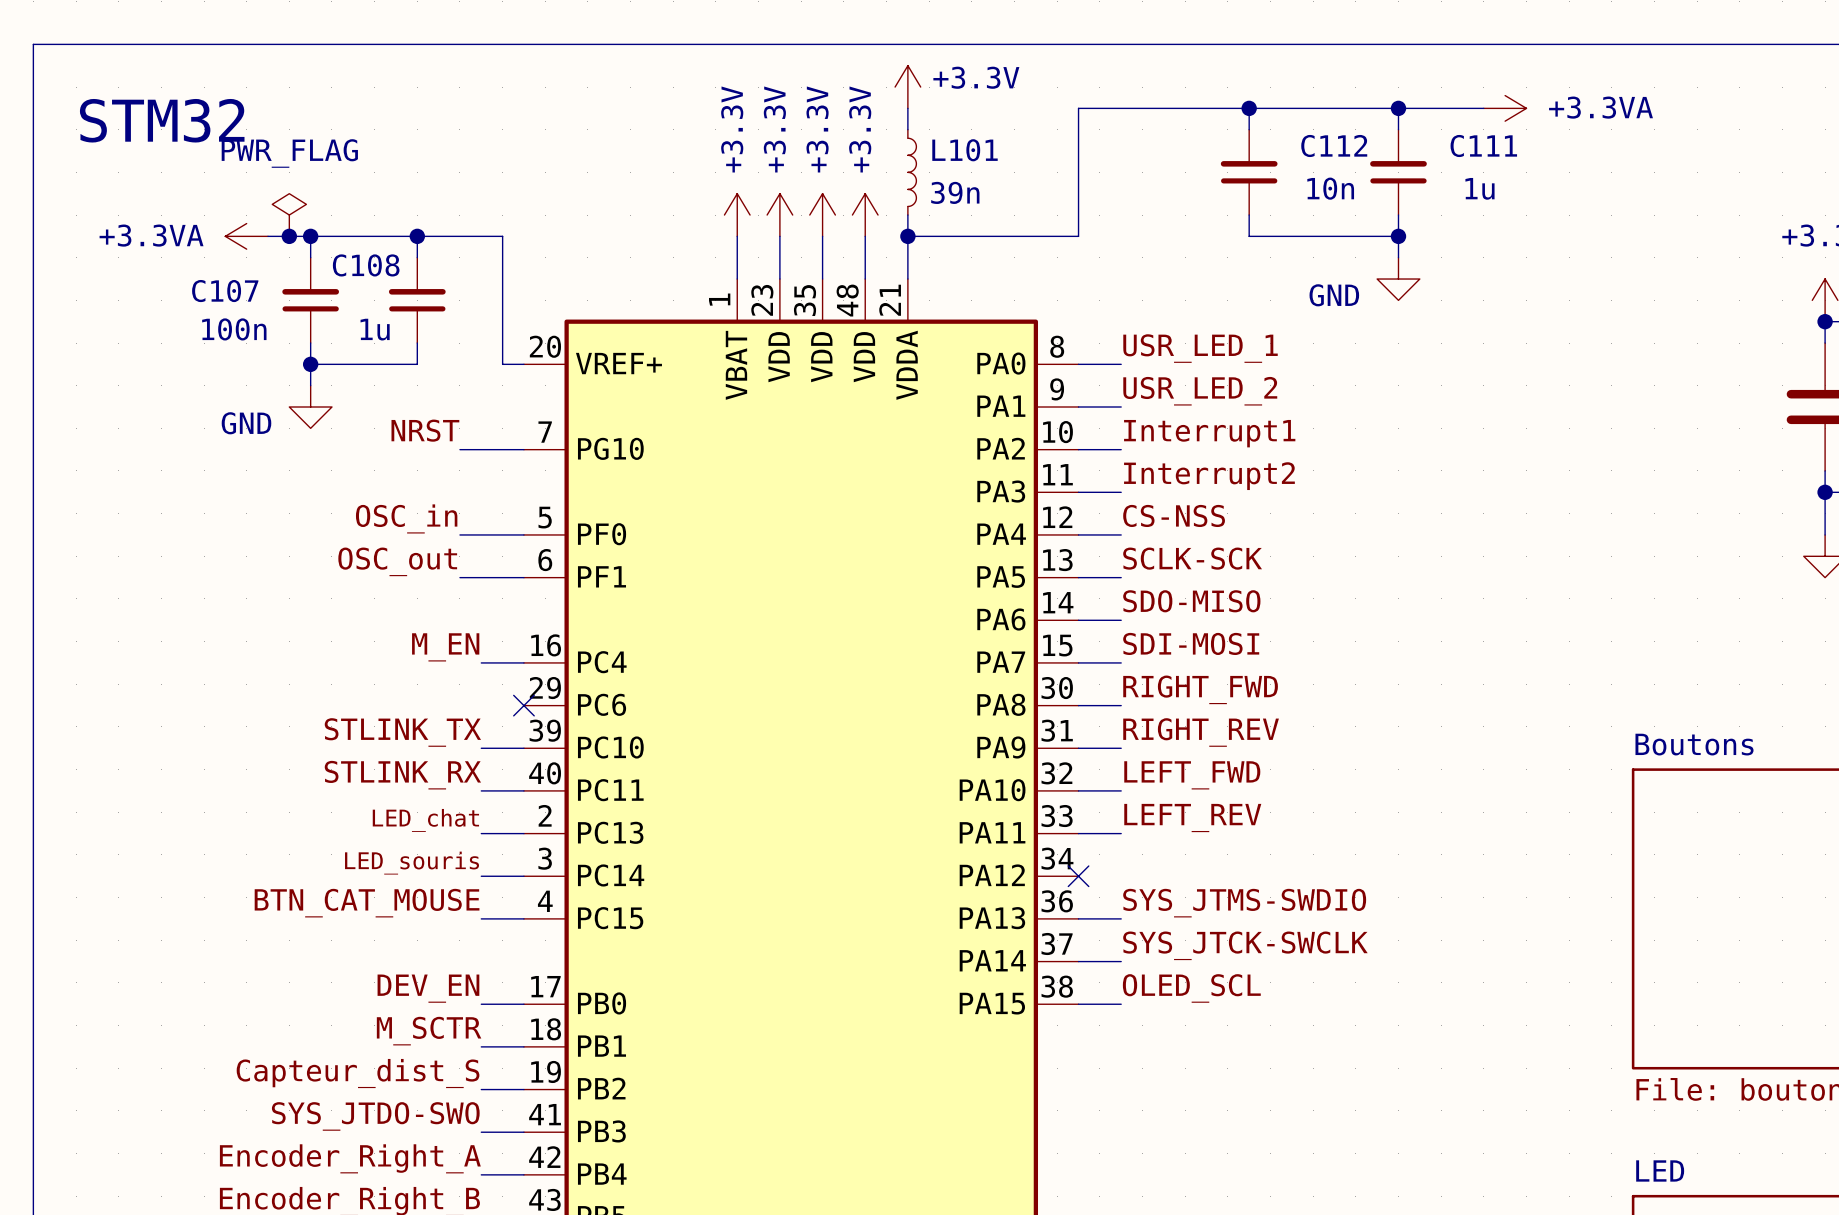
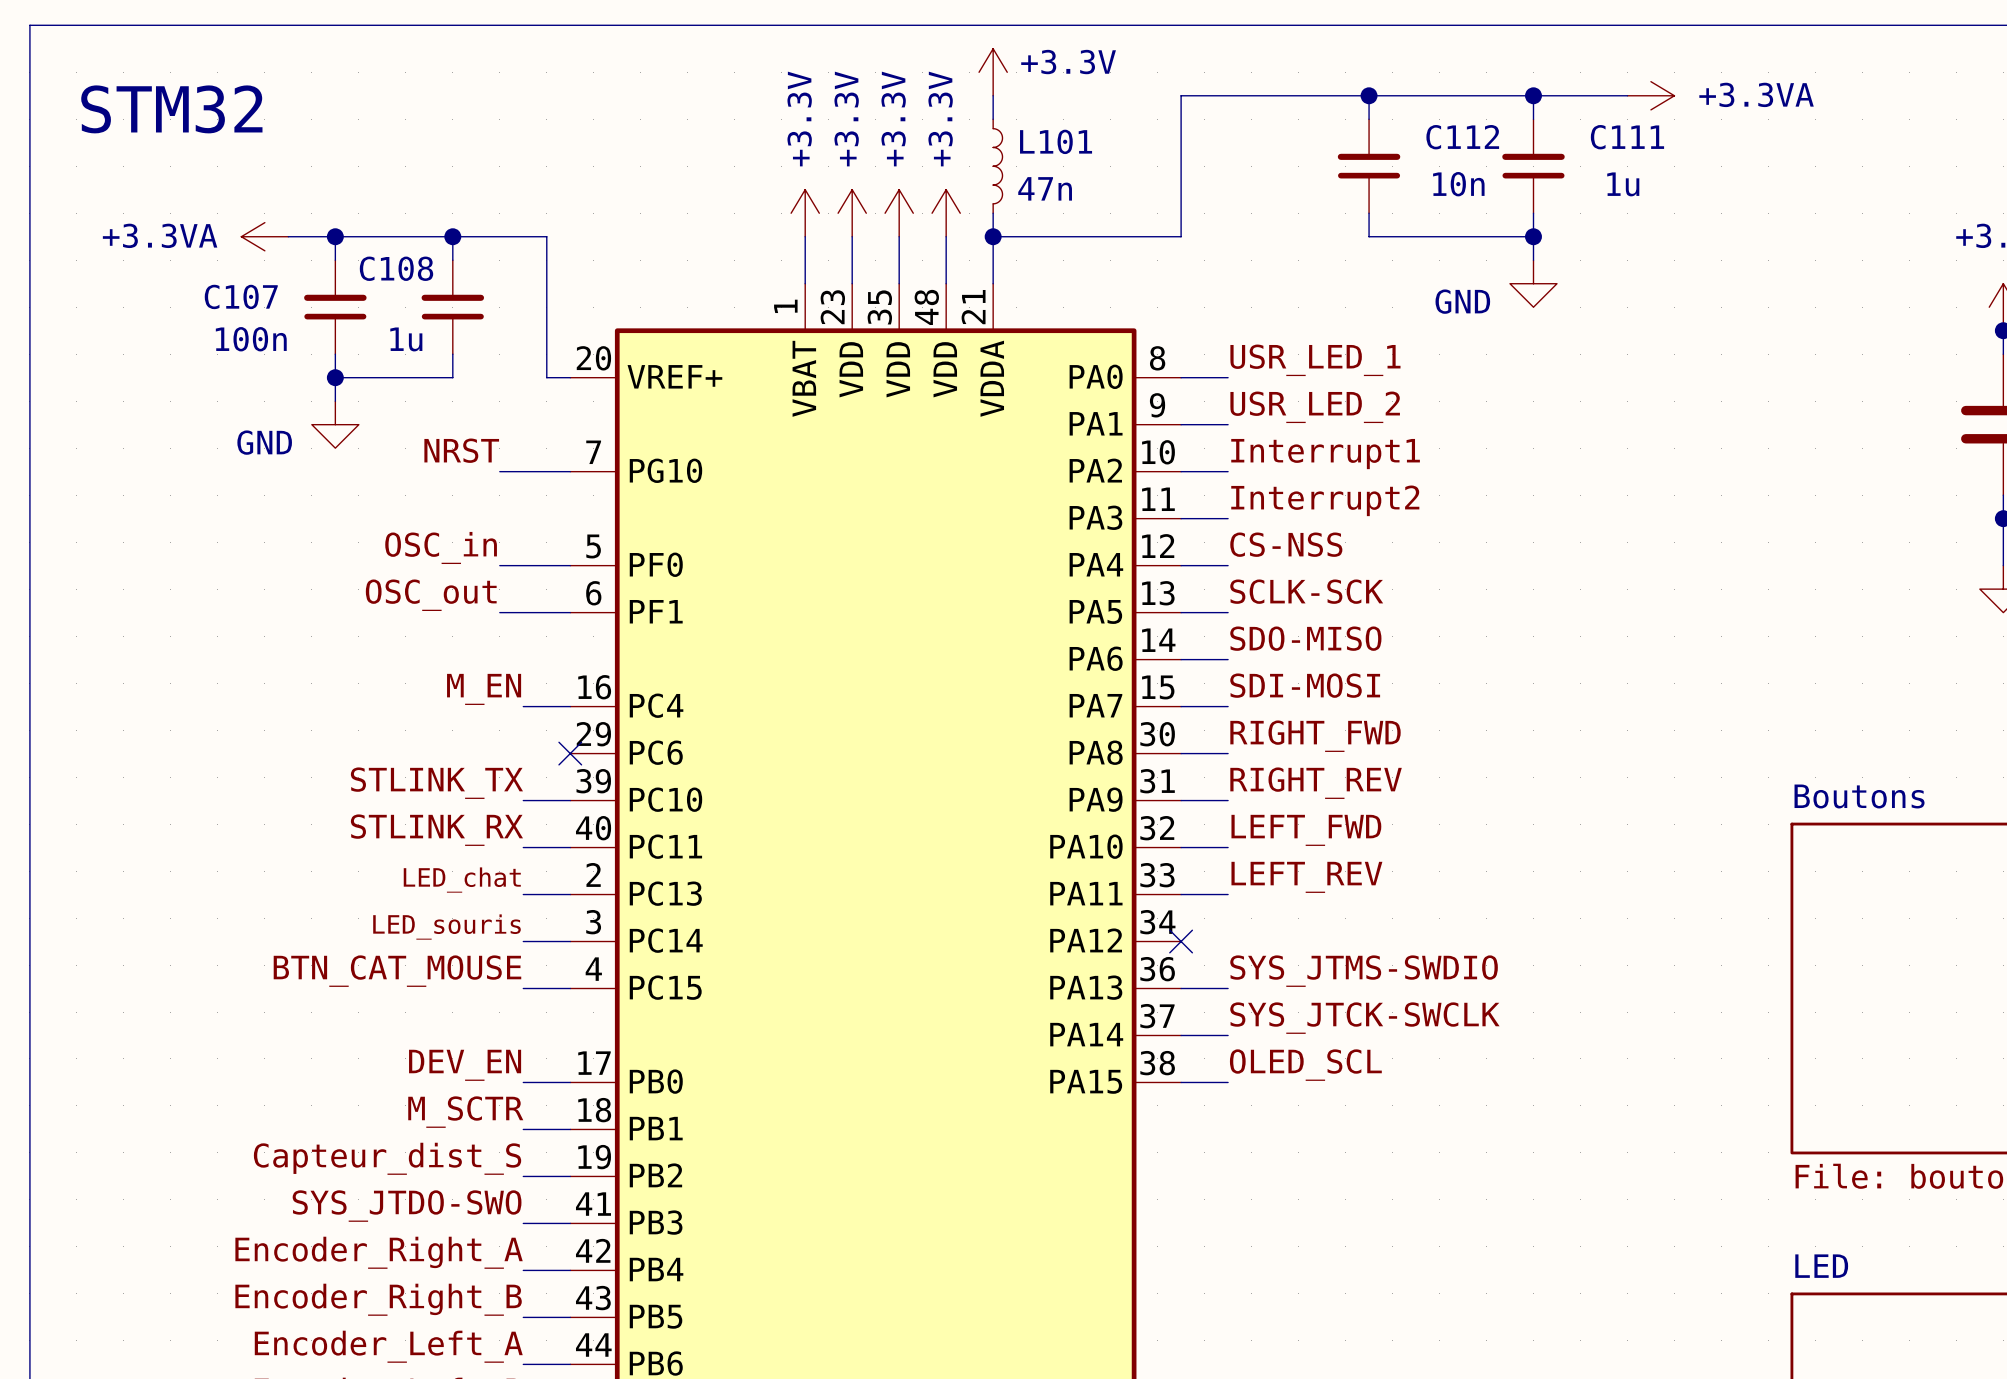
L101 value: 39n (955, 192) -> 47n (1045, 188)
power symbol: PWR_FLAG (289, 215) -> none
junction: (289, 236) -> none

